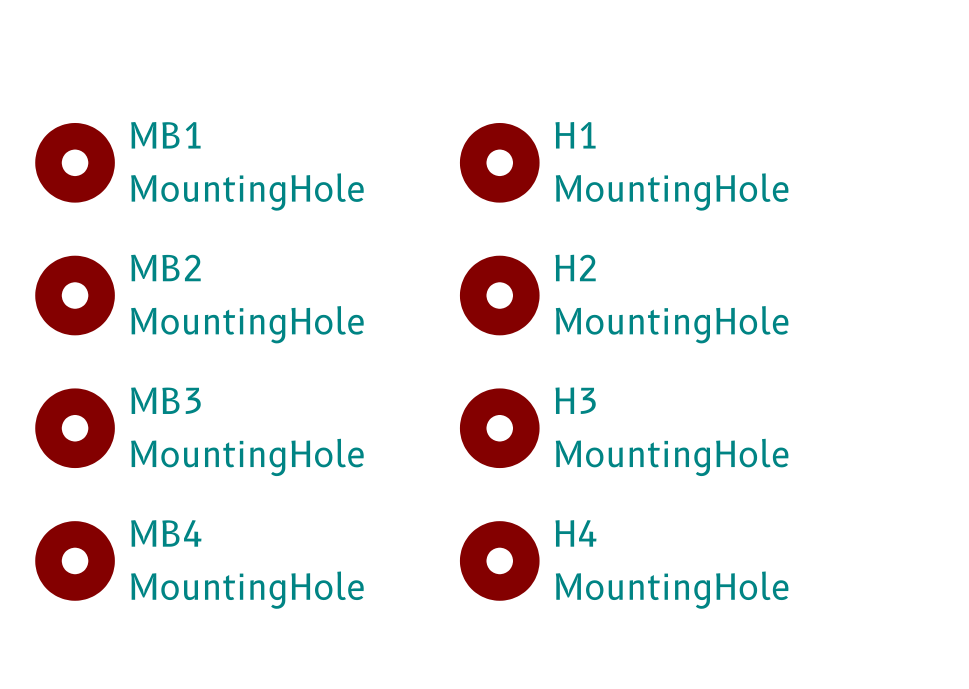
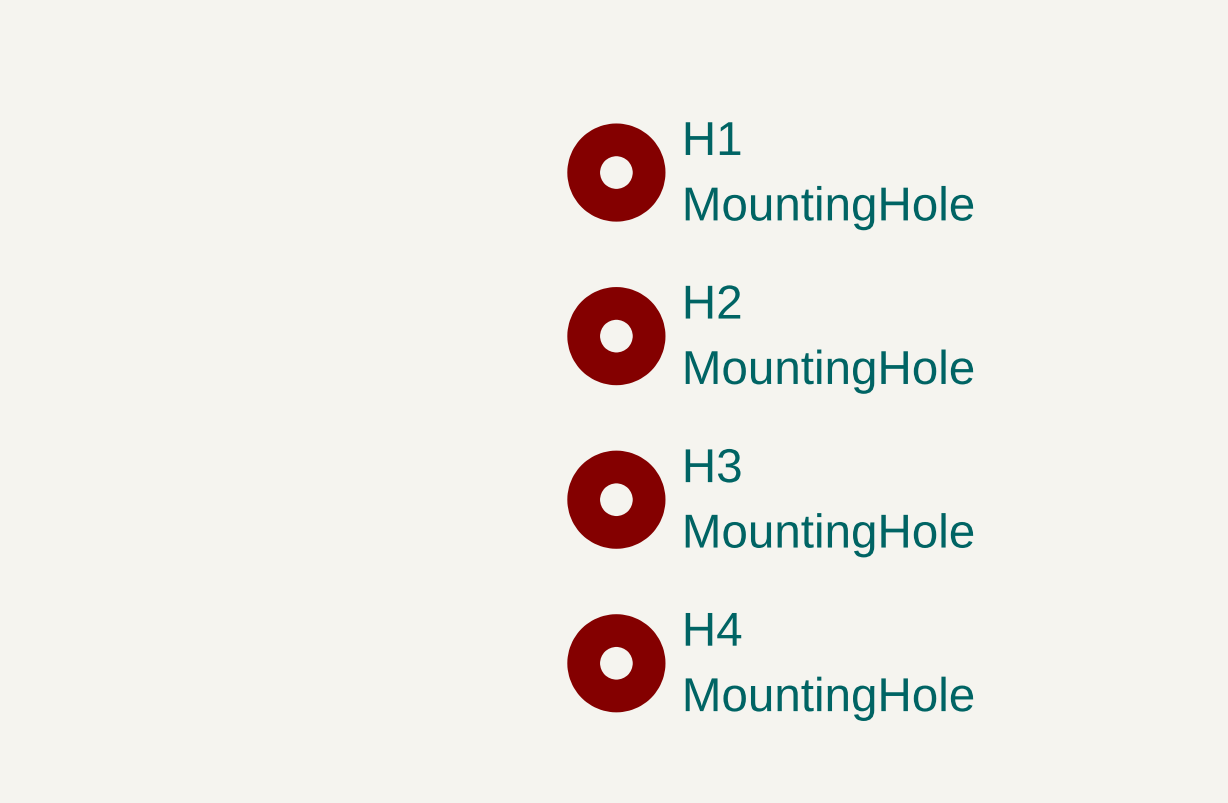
MB1: MountingHole (75, 162) -> none
MB2: MountingHole (75, 295) -> none
MB3: MountingHole (75, 428) -> none
MB4: MountingHole (75, 560) -> none

